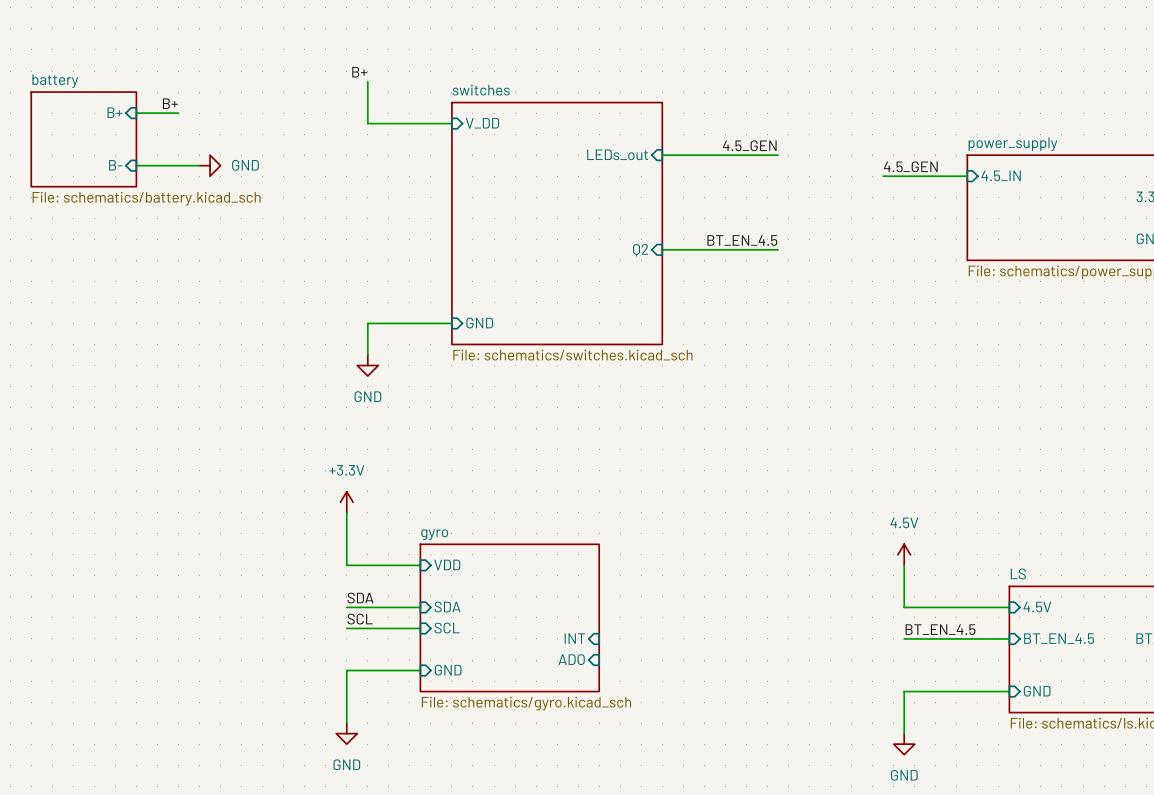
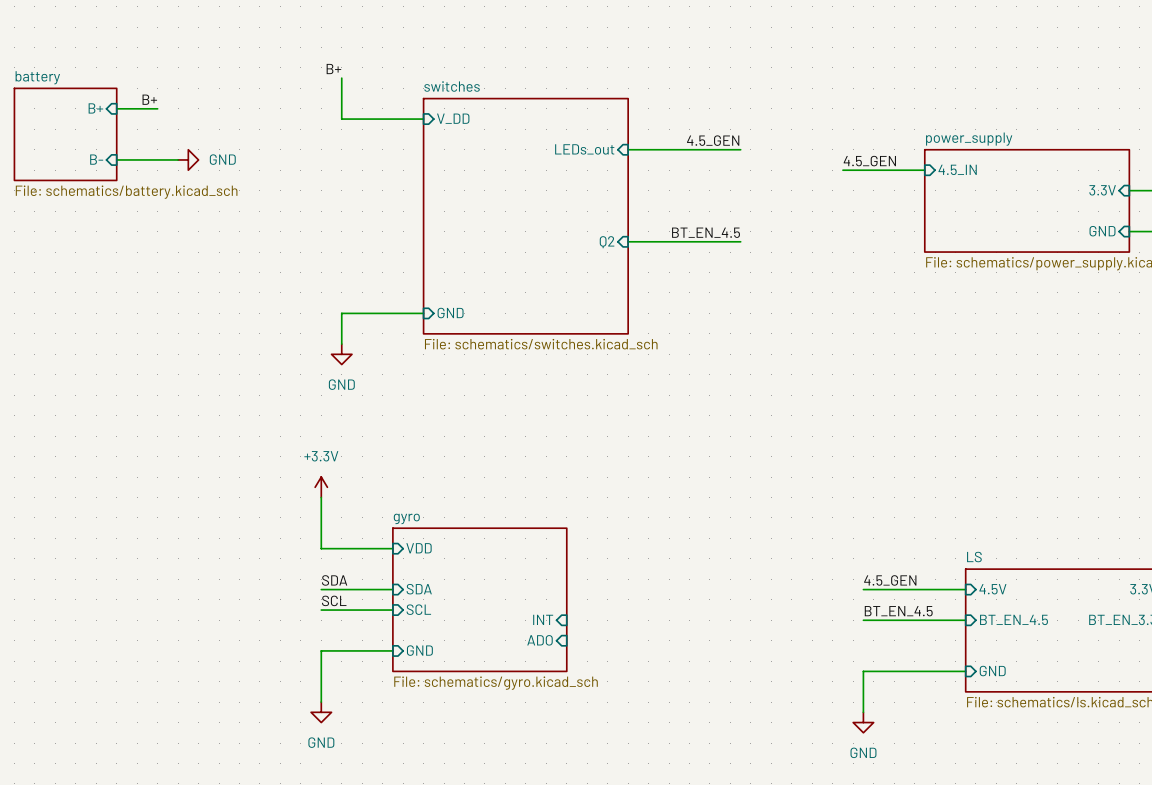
power symbol: 4.5V (904, 554) -> none
wire: (904, 565) (904, 607) -> none
label: none -> 4.5_GEN (890, 580)

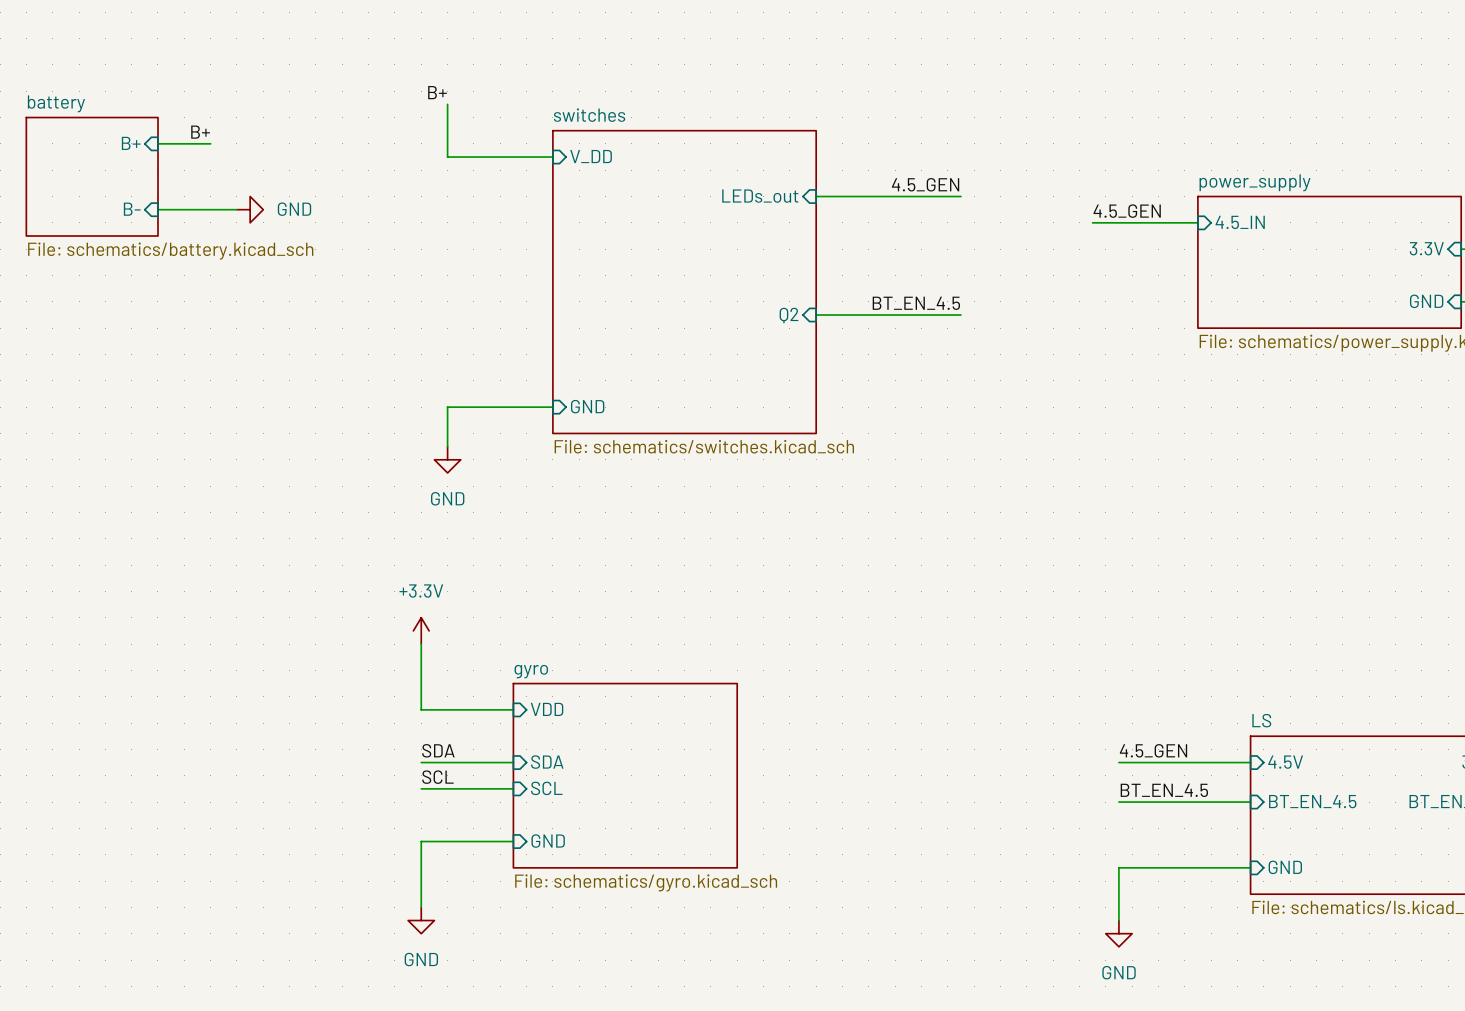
sheet pin: INT (543, 619) -> none
sheet pin: ADO (540, 640) -> none

